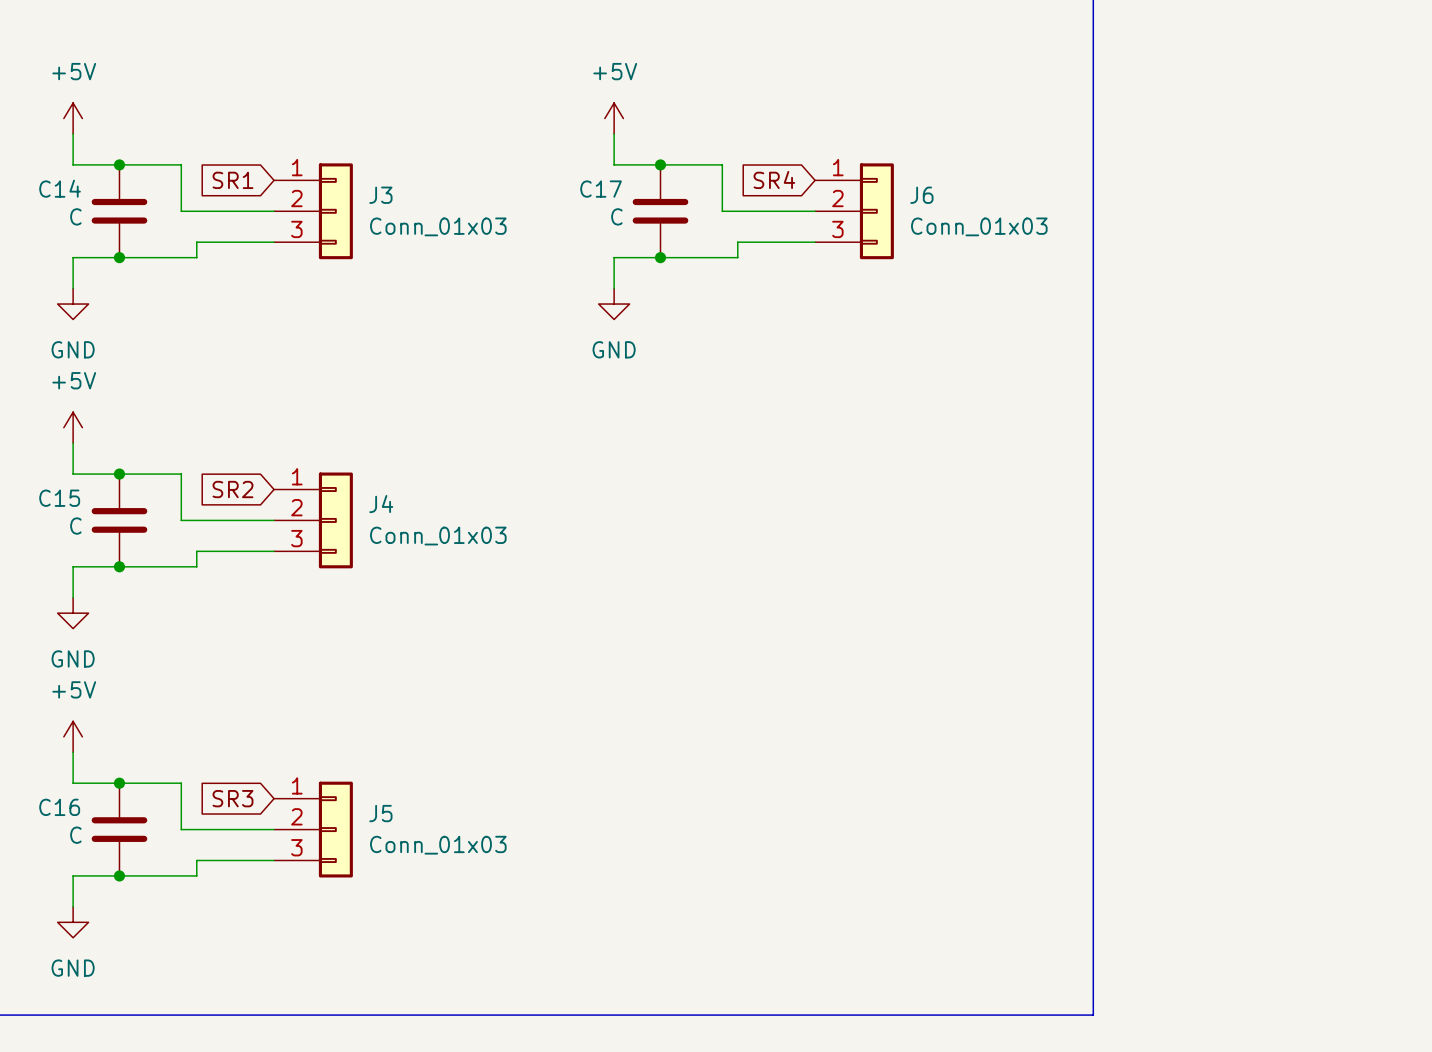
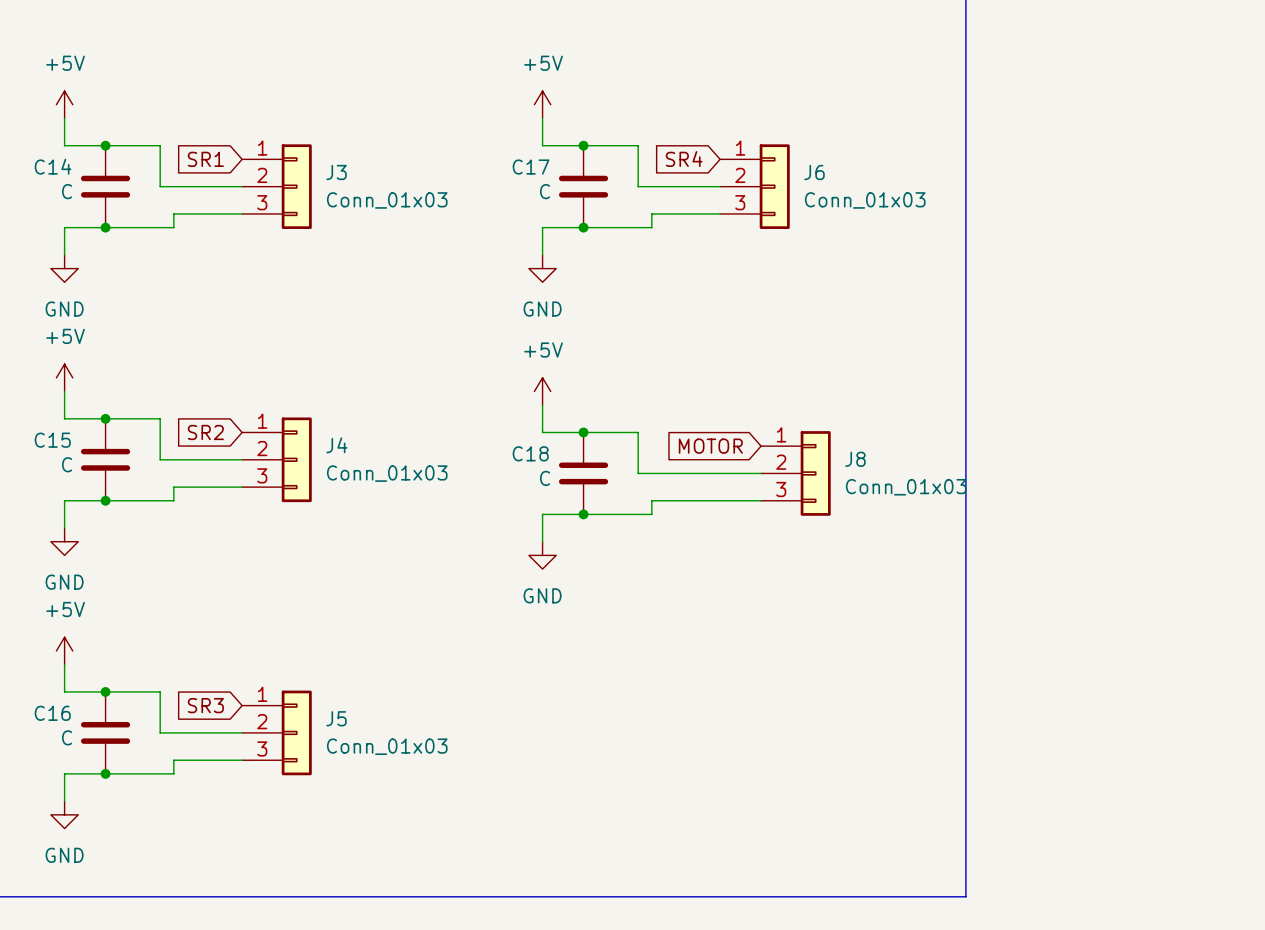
power symbol: none -> +5V (542, 391)
wire: none -> (542, 405) (542, 432) (638, 432) (638, 473) (761, 473)
junction: none -> (583, 432)
global label: none -> MOTOR (710, 446)
C18: none -> C (583, 473)
J8: none -> Conn_01x03 (795, 473)
wire: none -> (761, 500) (651, 500) (651, 514) (542, 514) (542, 541)
junction: none -> (583, 514)
power symbol: none -> GND (542, 555)

